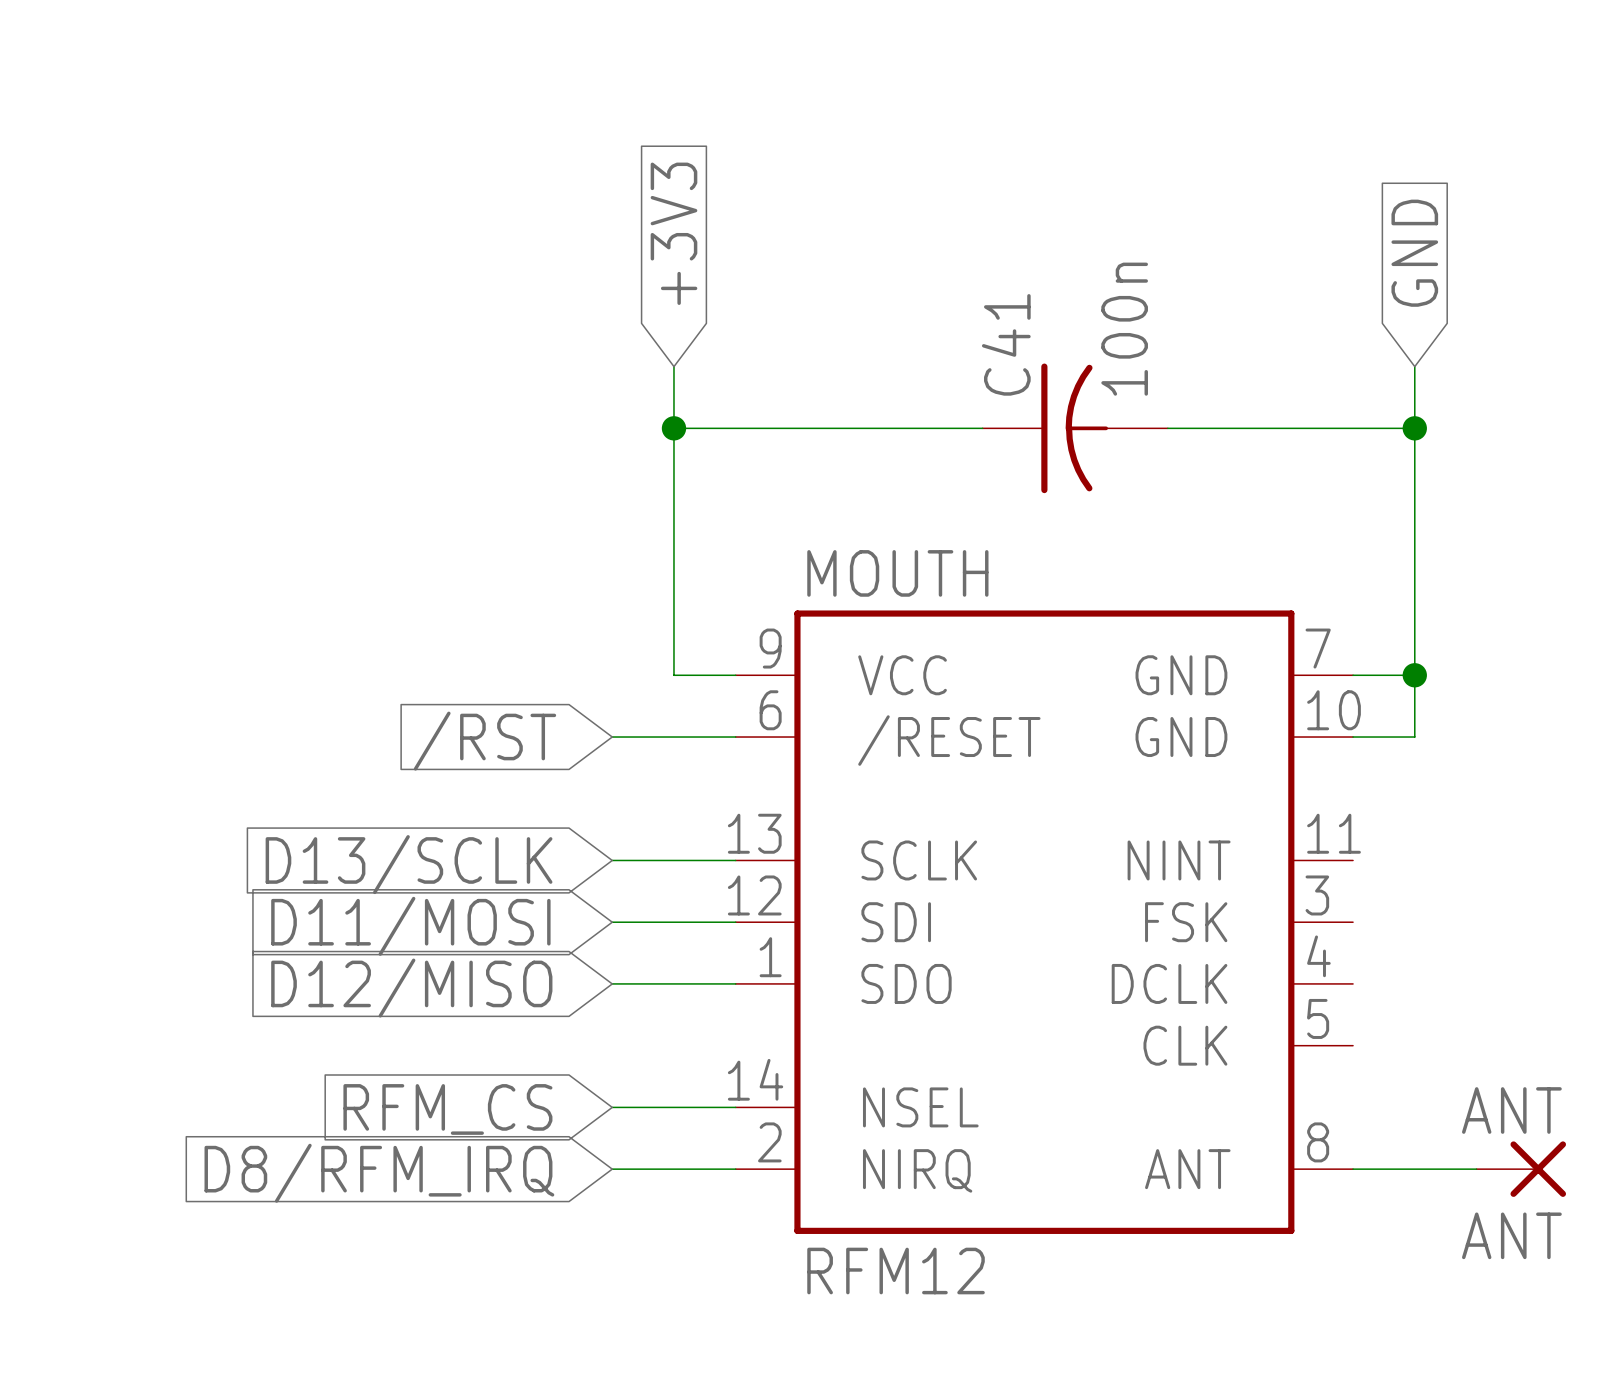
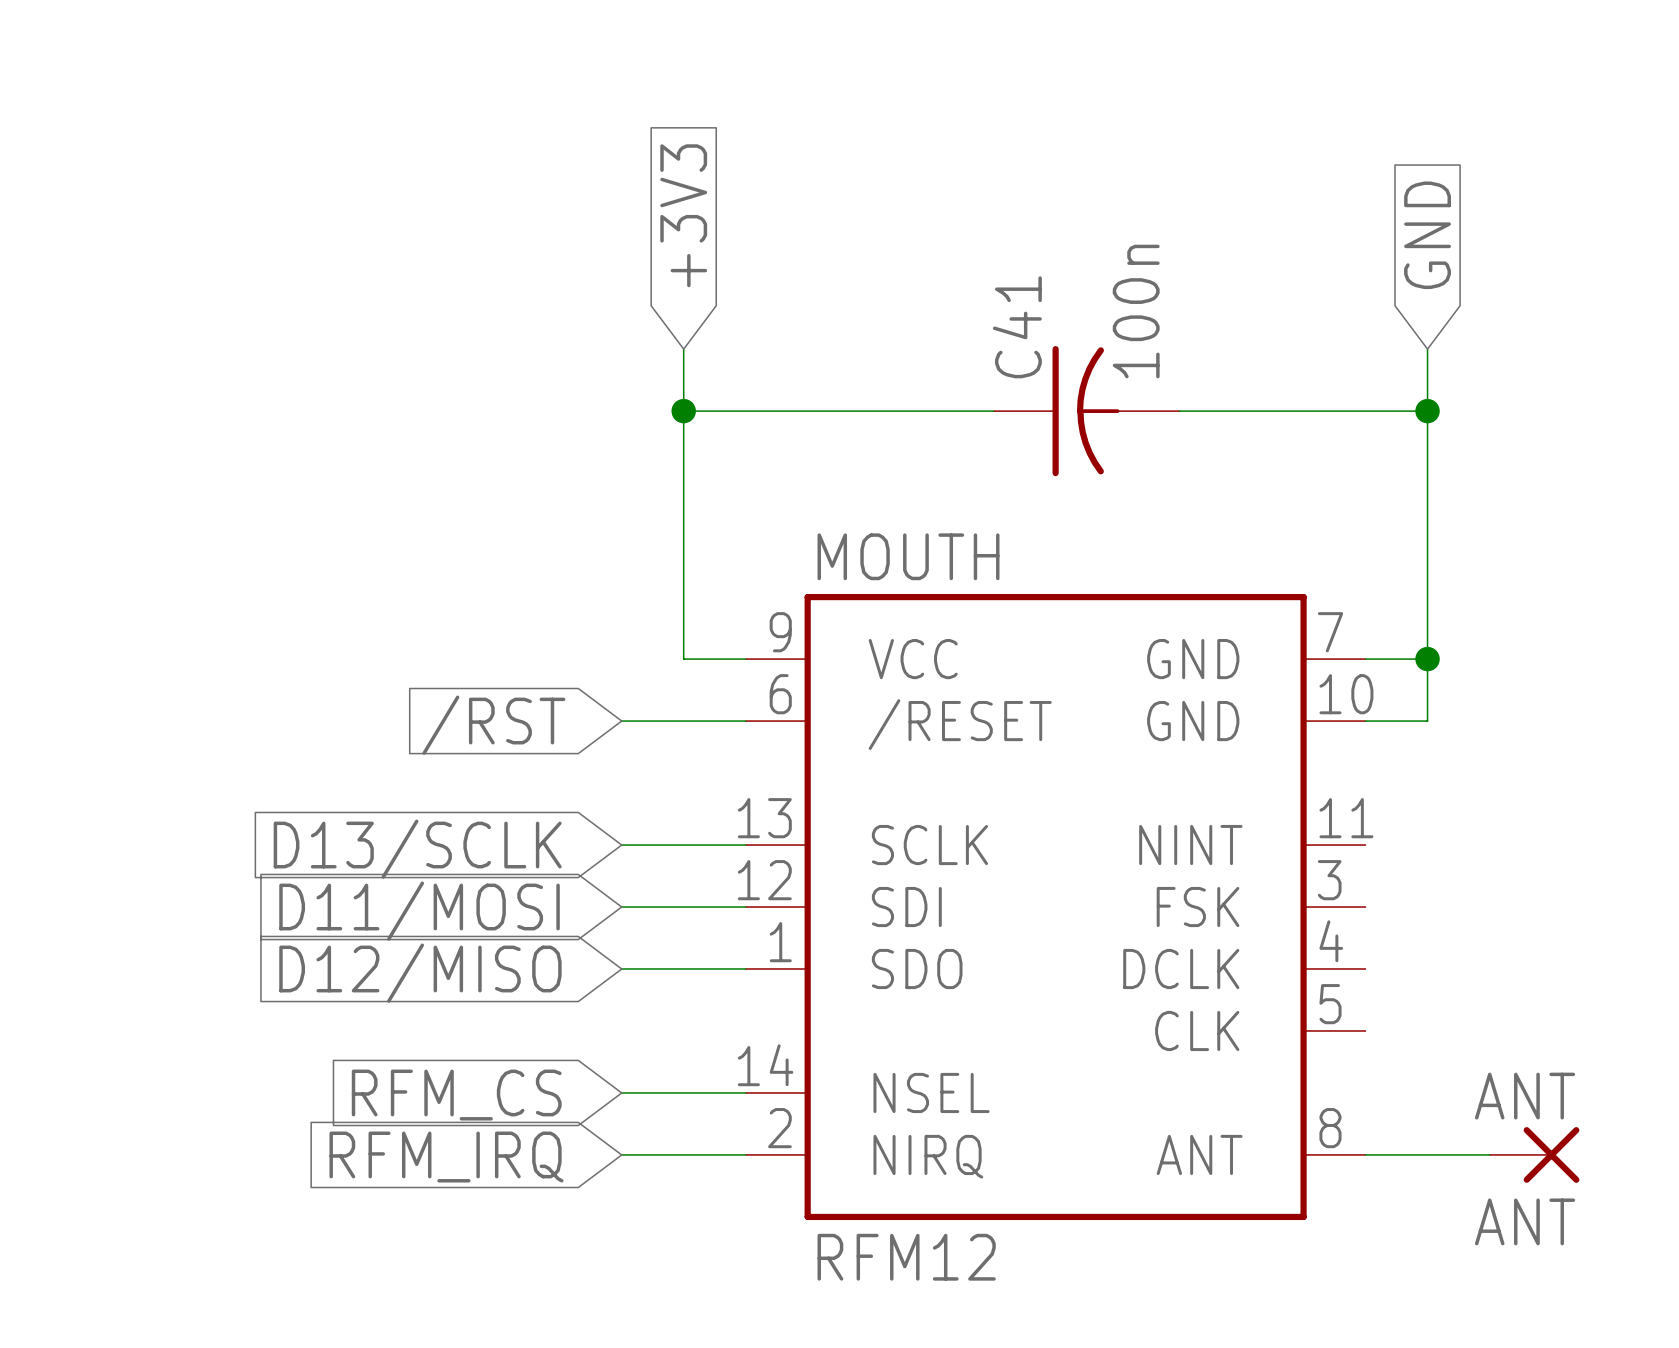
global label: D8/RFM_IRQ (379, 1173) -> RFM_IRQ (446, 1157)

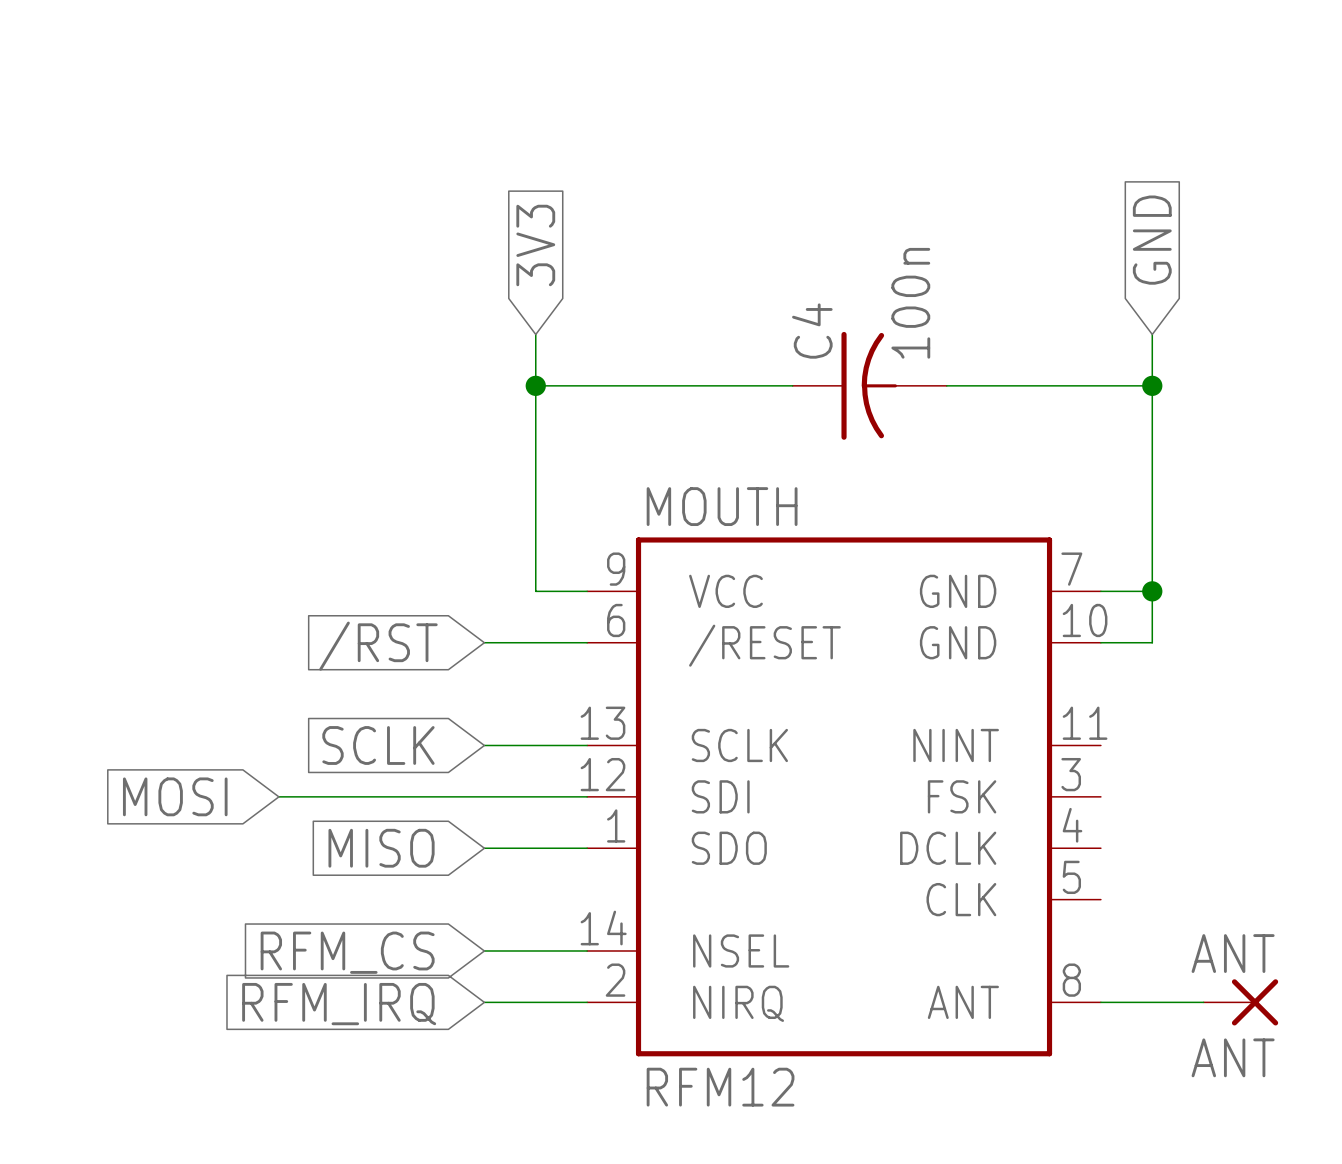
global label: +3V3 (683, 215) -> 3V3 (535, 245)
C41 name: C41 (1017, 327) -> C4 (812, 331)
global label: D13/SCLK (417, 849) -> SCLK (378, 745)
wire: none -> (278, 796) (484, 796)
global label: D11/MOSI (419, 911) -> MOSI (175, 796)
global label: D12/MISO (420, 973) -> MISO (381, 848)

